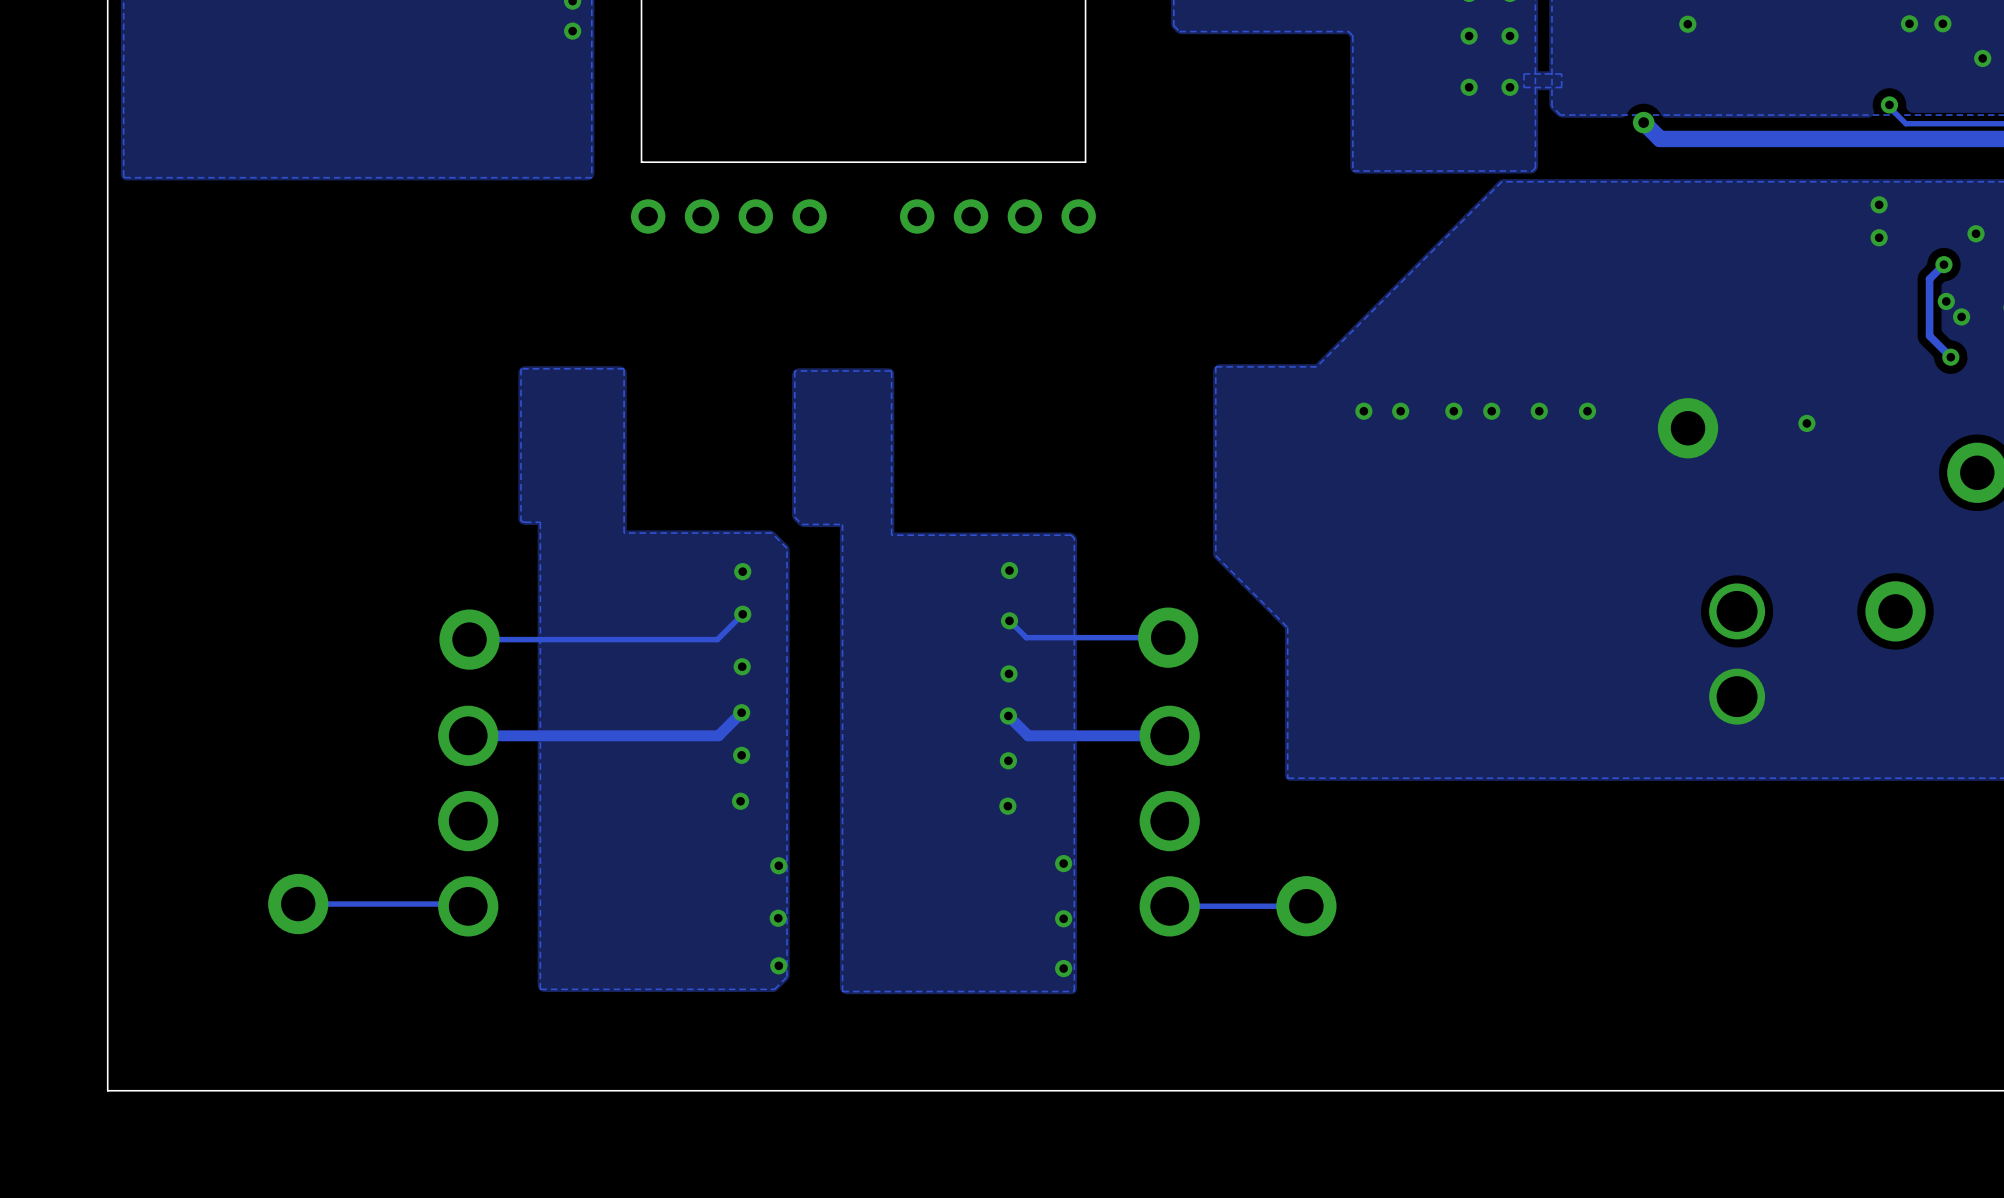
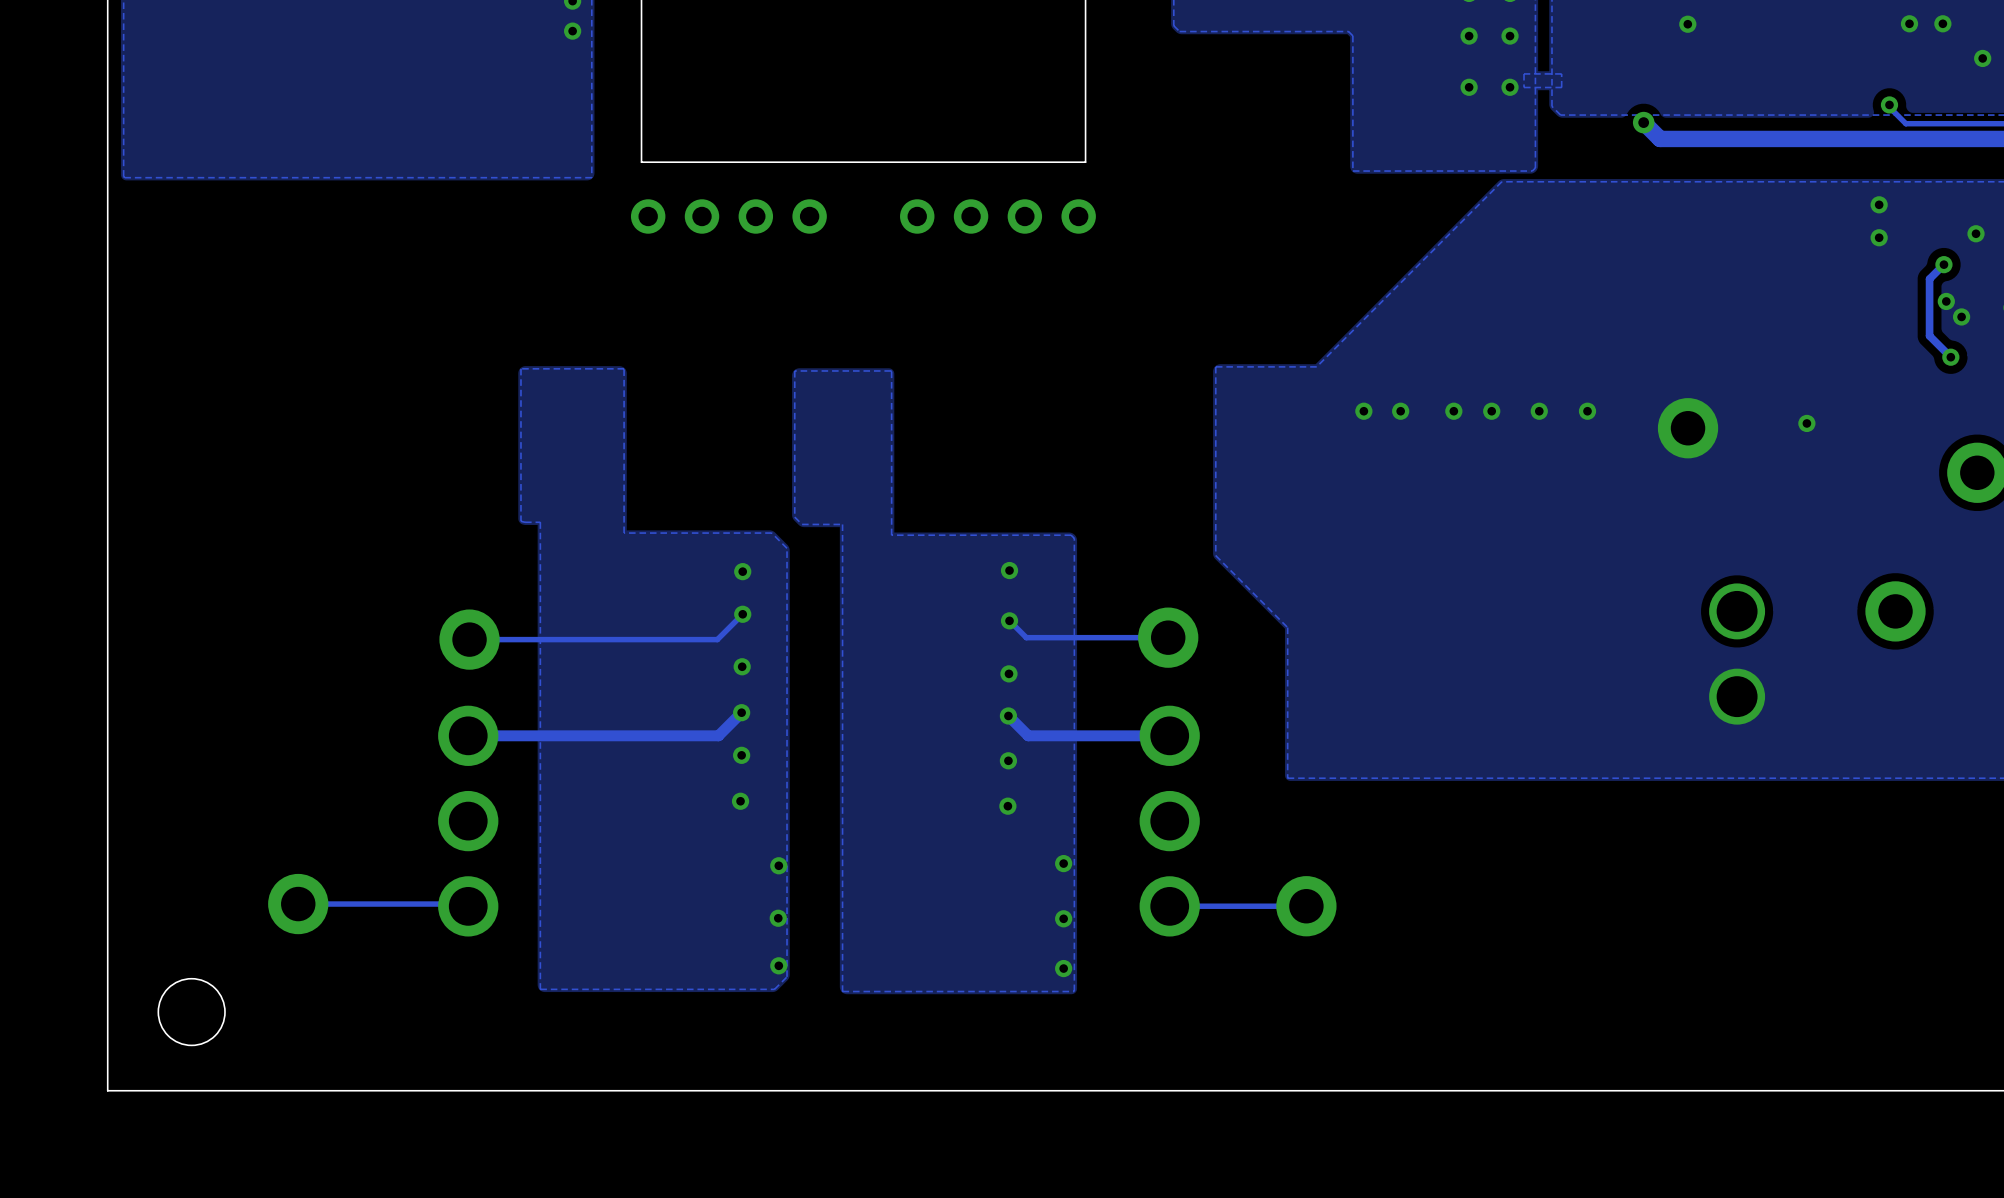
round board edge: none -> [157, 978, 226, 1046]

